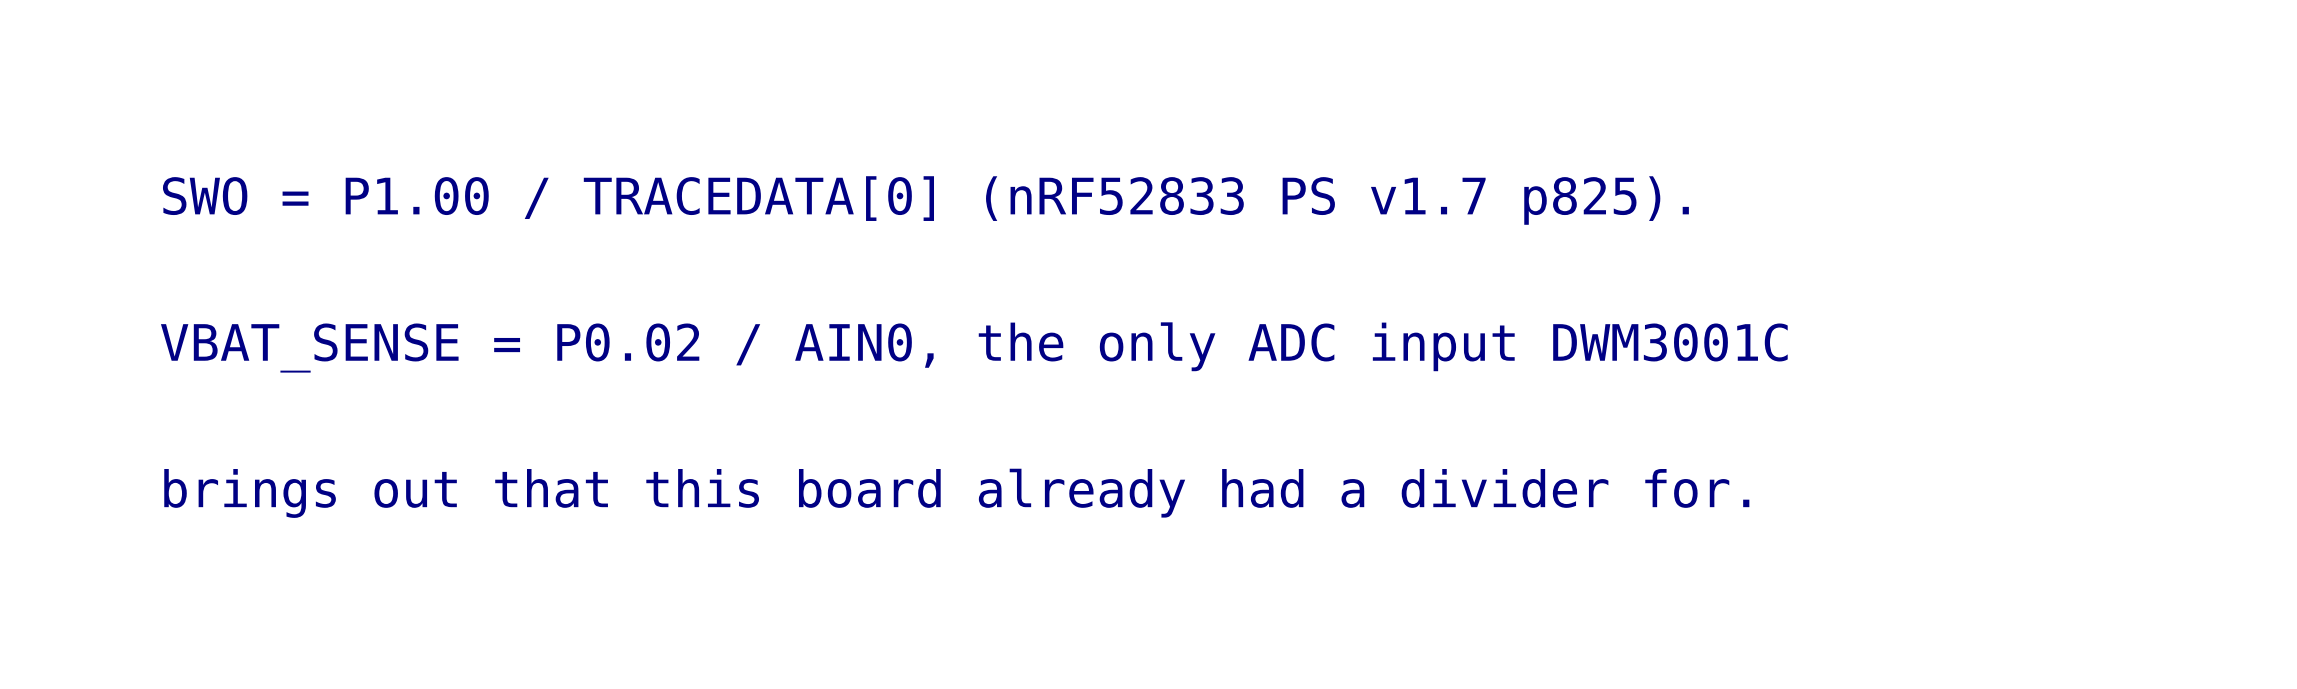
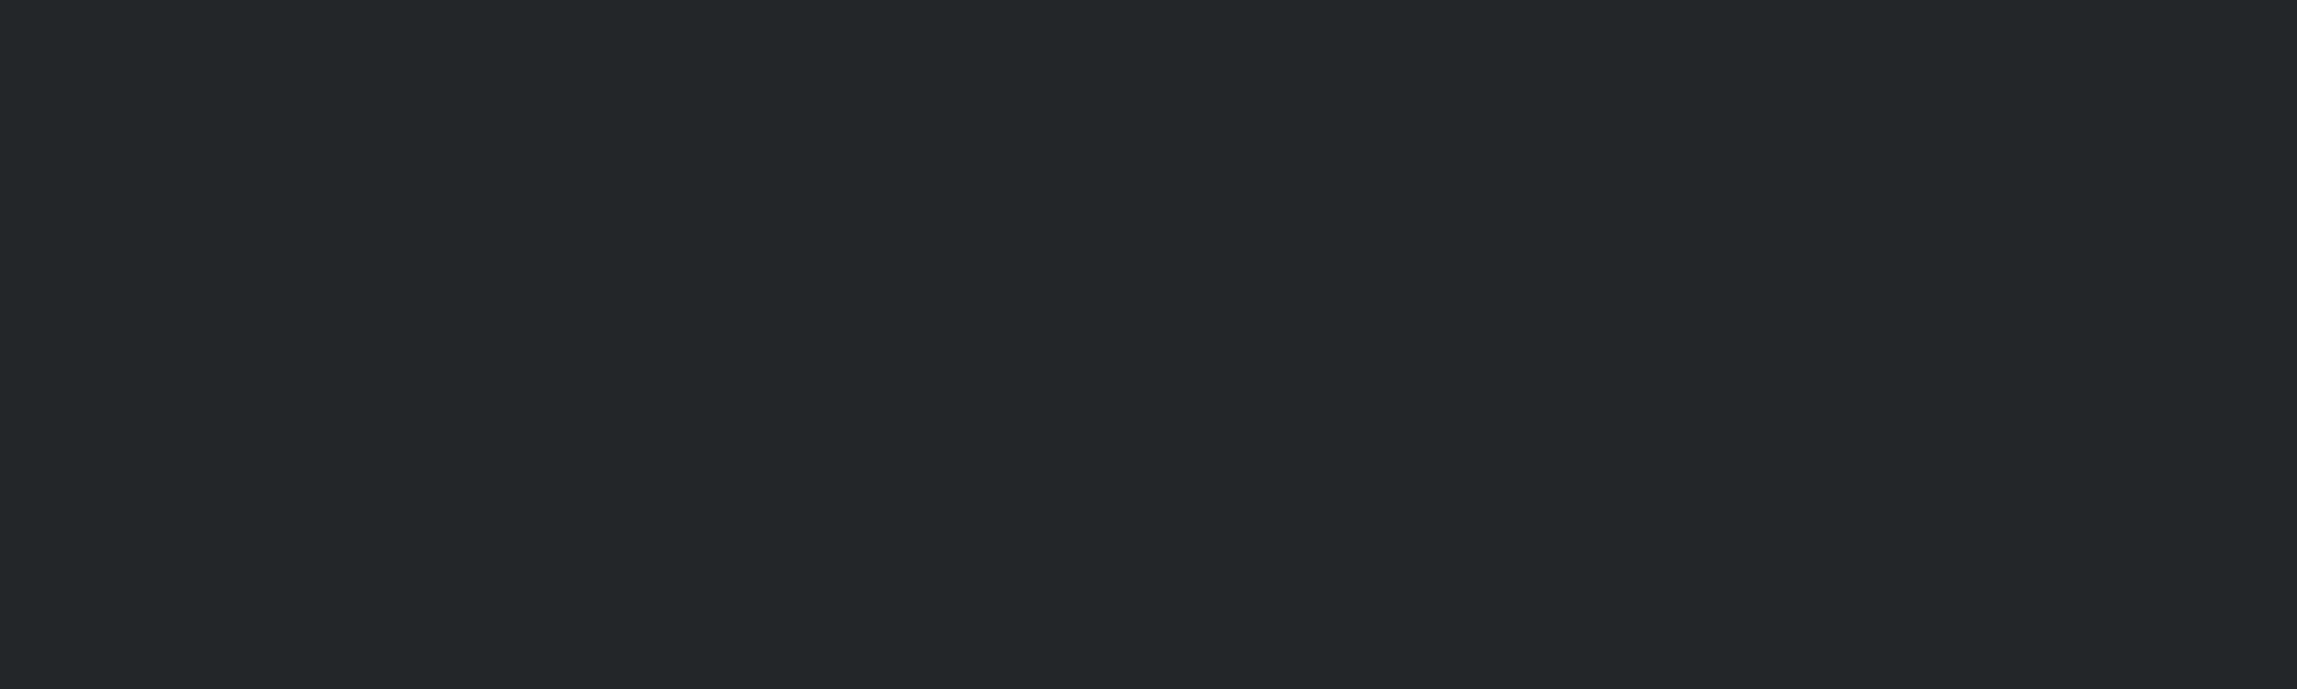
text: SWO = P1.00 / TRACEDATA[0] (nRF52833 PS v1.7 p825). (925, 200) -> none
text: VBAT_SENSE = P0.02 / AIN0, the only ADC input DWM3001C (974, 347) -> none
text: brings out that this board already had a divider for. (956, 493) -> none

